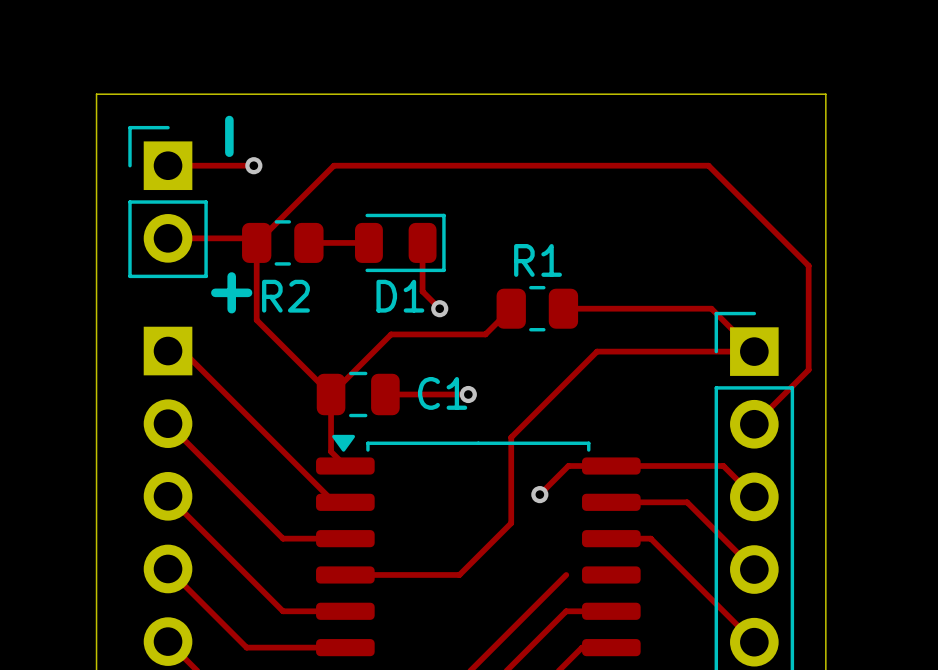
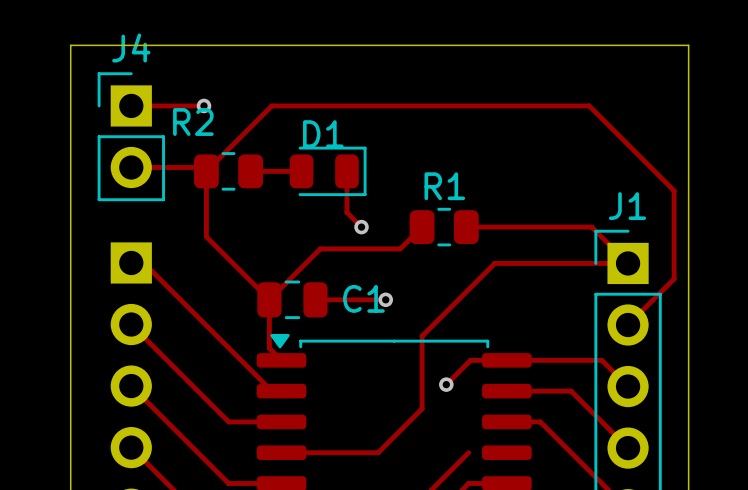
J4 name: none -> J4 (131, 48)
text: - (229, 136) -> none
J1 name: none -> J1 (627, 206)
text: + (231, 292) -> none
R2 name position: R2 (285, 296) -> R2 (193, 122)
D1 name position: D1 (400, 296) -> D1 (323, 134)

